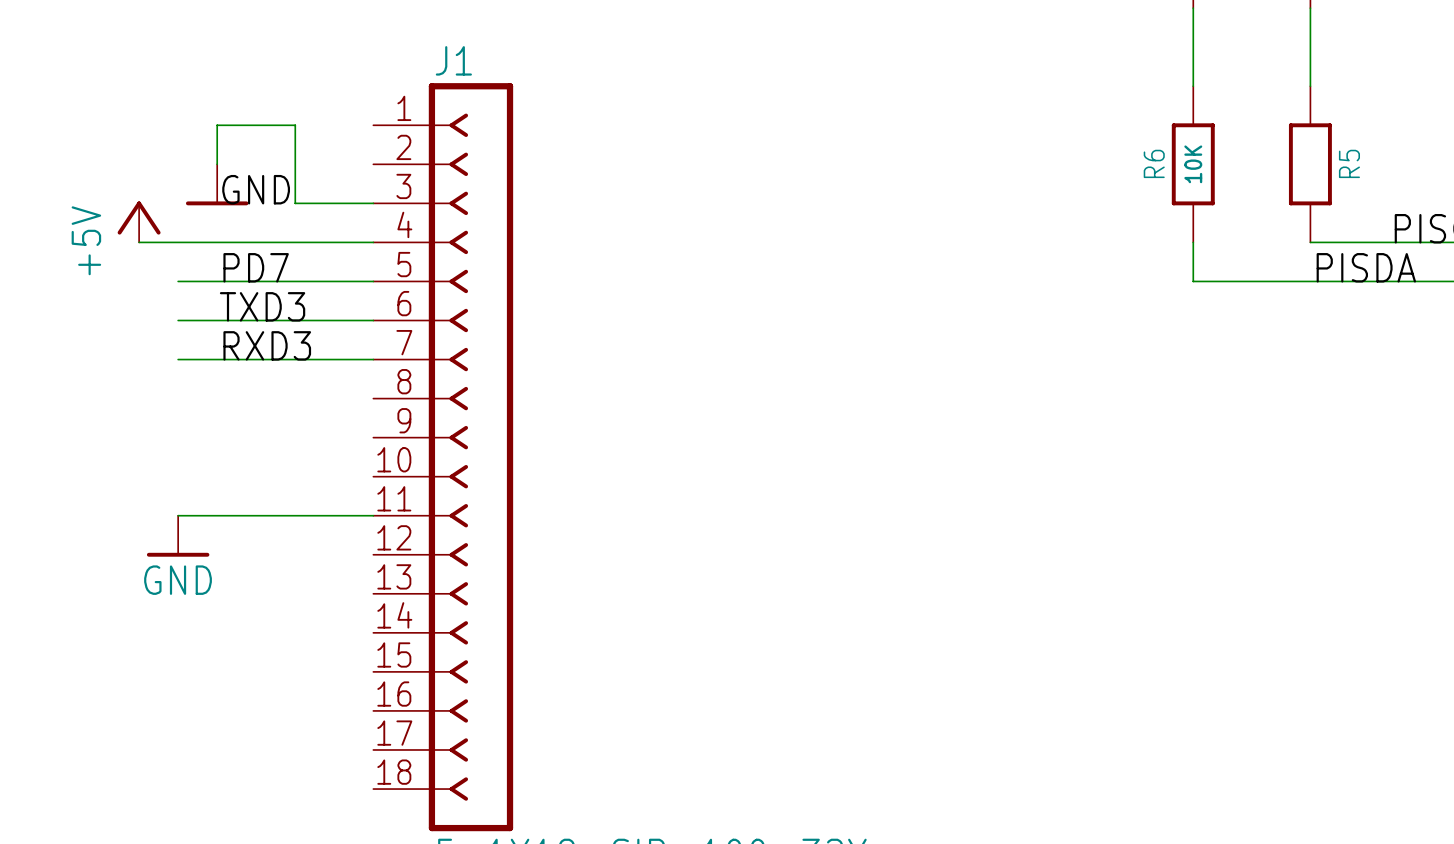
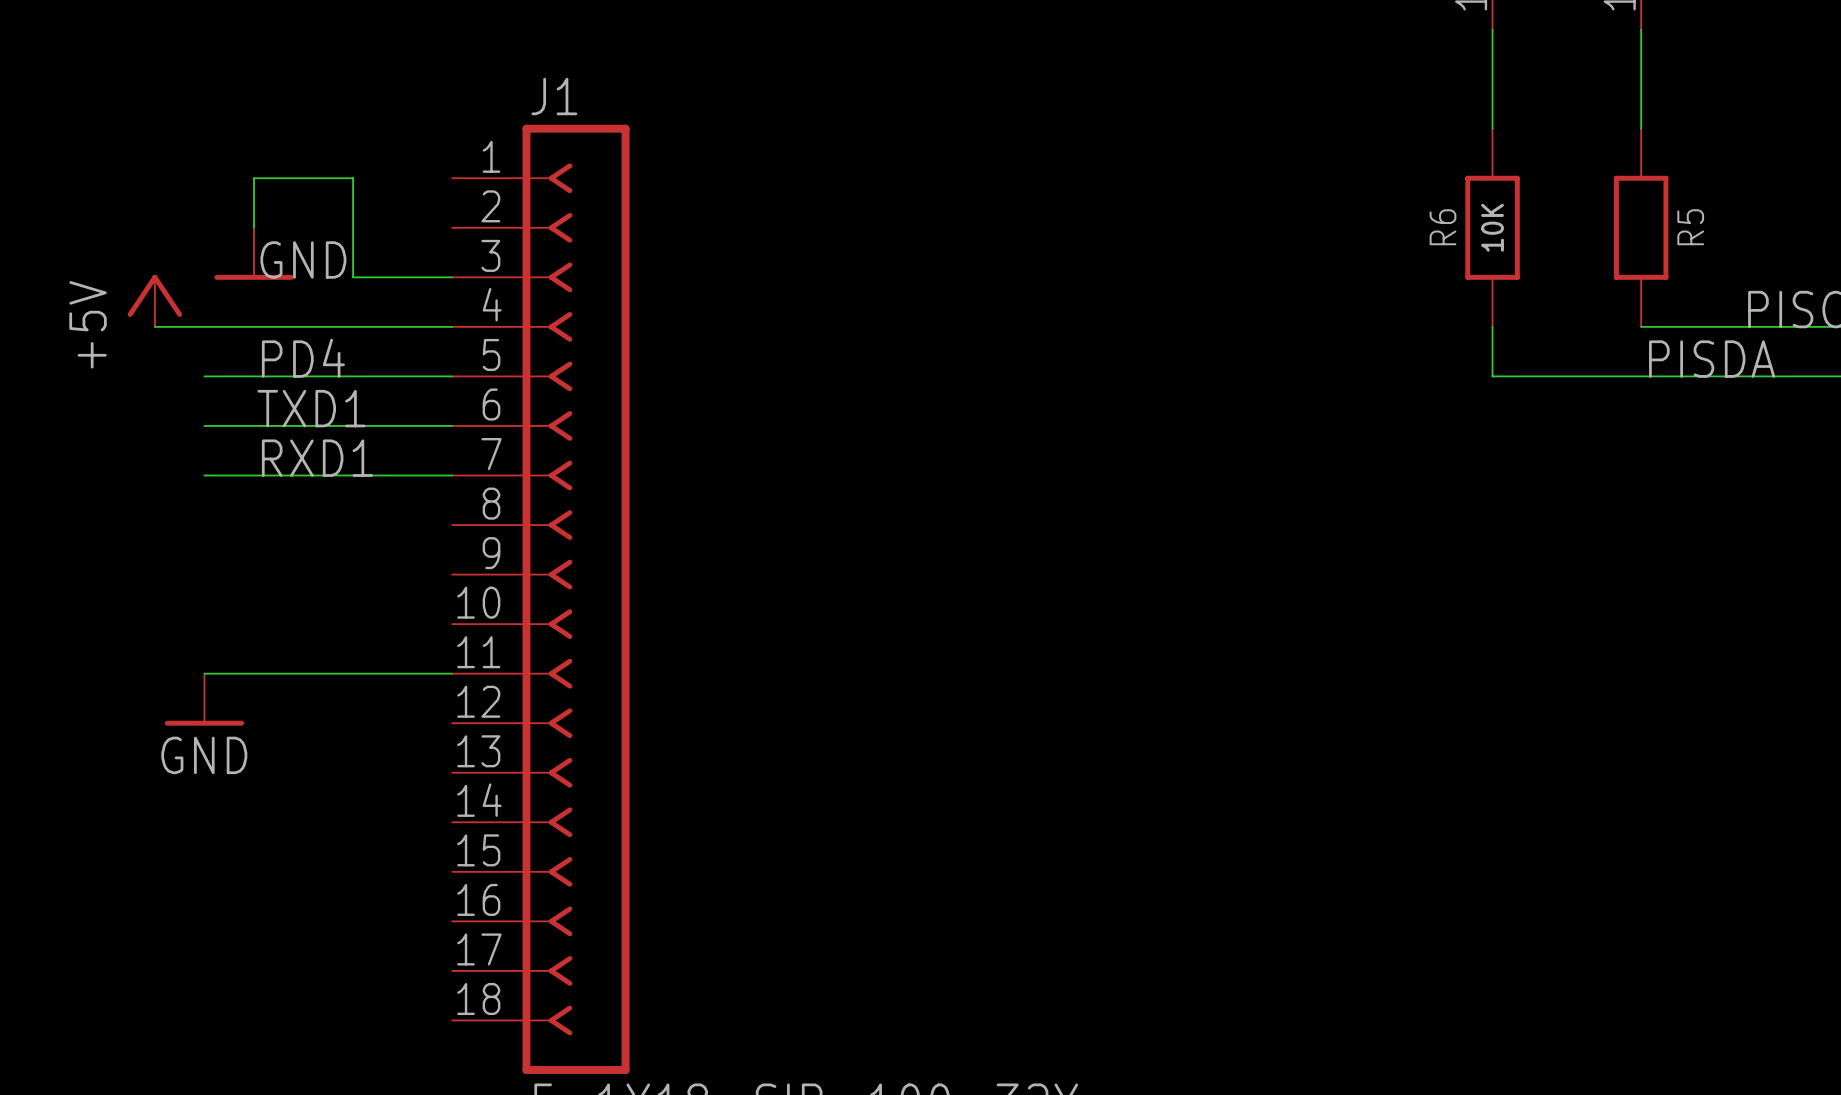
label: PD7 (256, 267) -> PD4 (303, 358)
label: TXD3 (262, 306) -> TXD1 (311, 408)
label: RXD3 (267, 345) -> RXD1 (317, 458)

